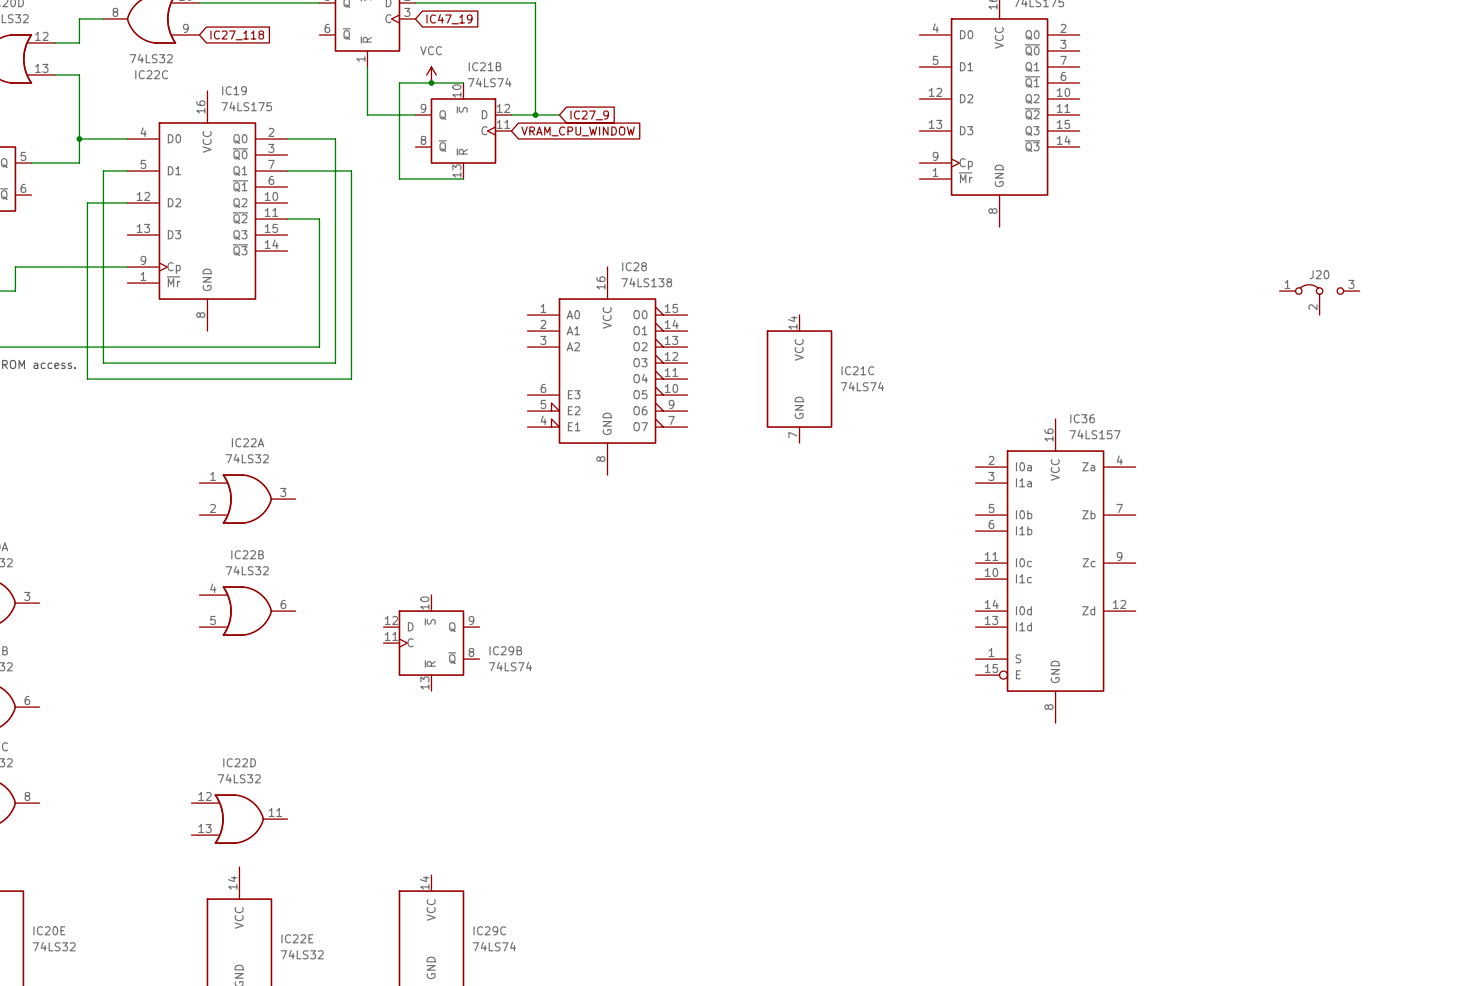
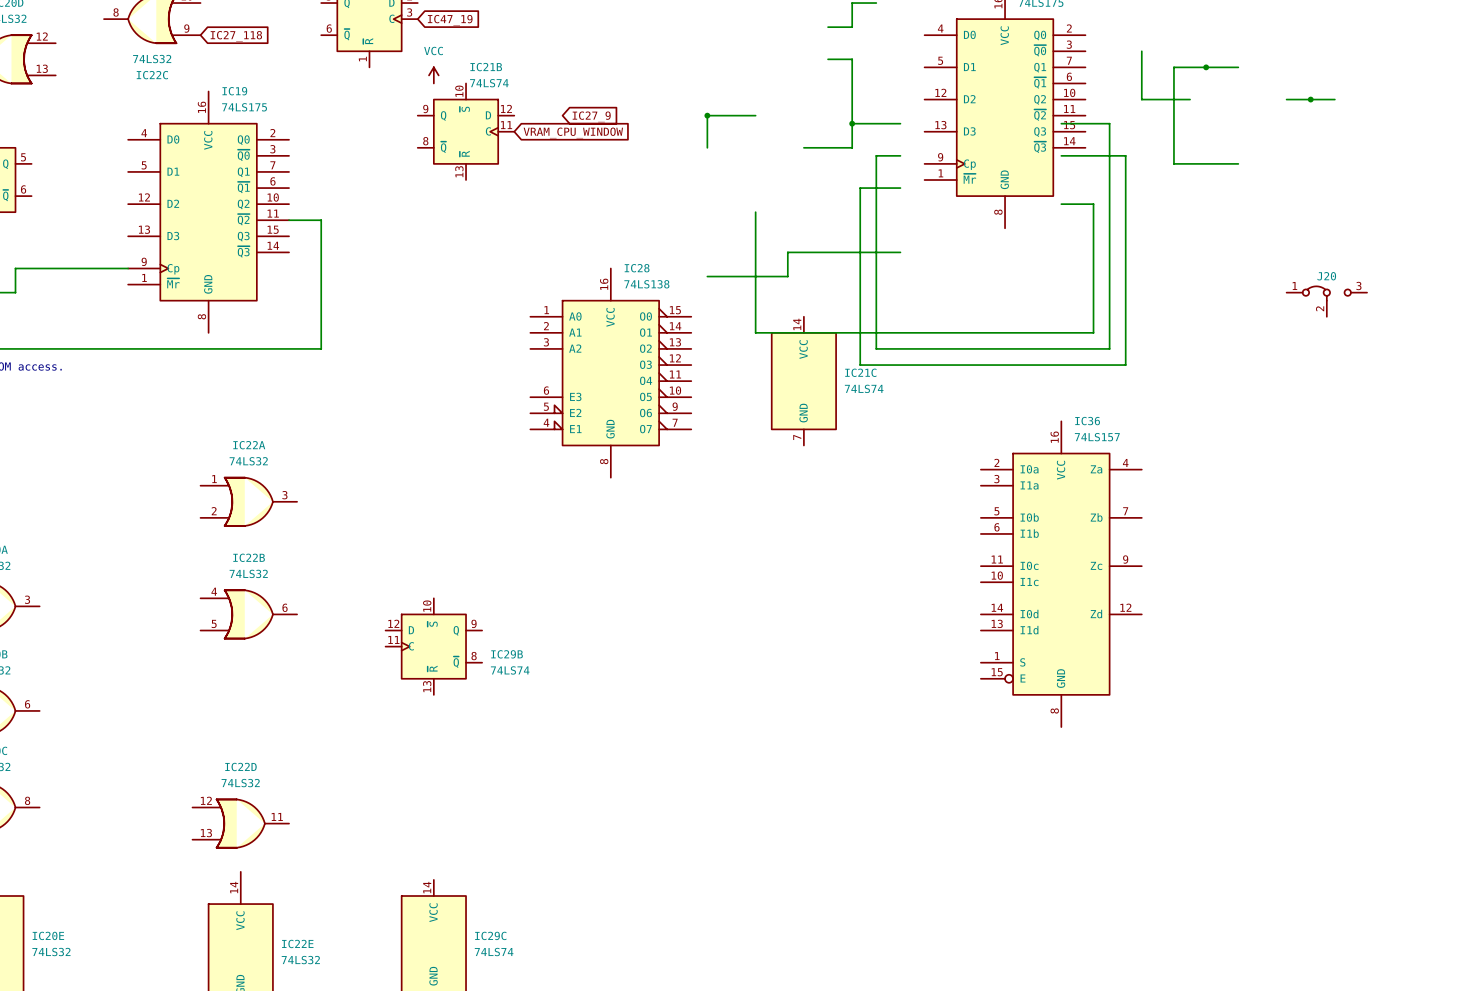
wire: (199, 3) (319, 3) -> none
wire: (415, 3) (535, 3) (535, 115) -> none
wire: none -> (876, 3) (852, 3) (852, 27) (828, 27)
wire: (103, 19) (79, 19) (79, 43) (55, 43) -> none
wire: none -> (1141, 51) (1141, 99) (1190, 99)
wire: none -> (828, 59) (852, 59) (852, 147) (803, 147)
wire: (367, 67) (367, 115) (415, 115) -> none
junction: none -> (1206, 67)
wire: none -> (1238, 67) (1173, 67) (1173, 163) (1238, 163)
wire: (55, 75) (79, 75) (79, 163) (31, 163) -> none
junction: (431, 83) -> none
wire: (463, 83) (399, 83) (399, 179) (463, 179) -> none
wire: none -> (1286, 99) (1334, 99)
junction: none -> (1310, 99)
wire: (511, 115) (559, 115) -> none
junction: (535, 115) -> none
junction: none -> (707, 115)
wire: none -> (755, 115) (707, 115) (707, 147)
wire: none -> (852, 123) (900, 123)
junction: none -> (852, 123)
wire: none -> (1061, 123) (1109, 123) (1109, 348) (876, 348) (876, 155) (900, 155)
wire: (79, 139) (127, 139) -> none
junction: (79, 139) -> none
wire: (287, 139) (335, 139) (335, 363) (103, 363) (103, 171) (127, 171) -> none
wire: none -> (1061, 155) (1125, 155) (1125, 365) (860, 365) (860, 188) (900, 188)
wire: (287, 171) (351, 171) (351, 379) (87, 379) (87, 203) (127, 203) -> none
wire: none -> (1061, 204) (1093, 204) (1093, 332) (755, 332) (755, 212)
wire: none -> (900, 252) (787, 252) (787, 276) (707, 276)

